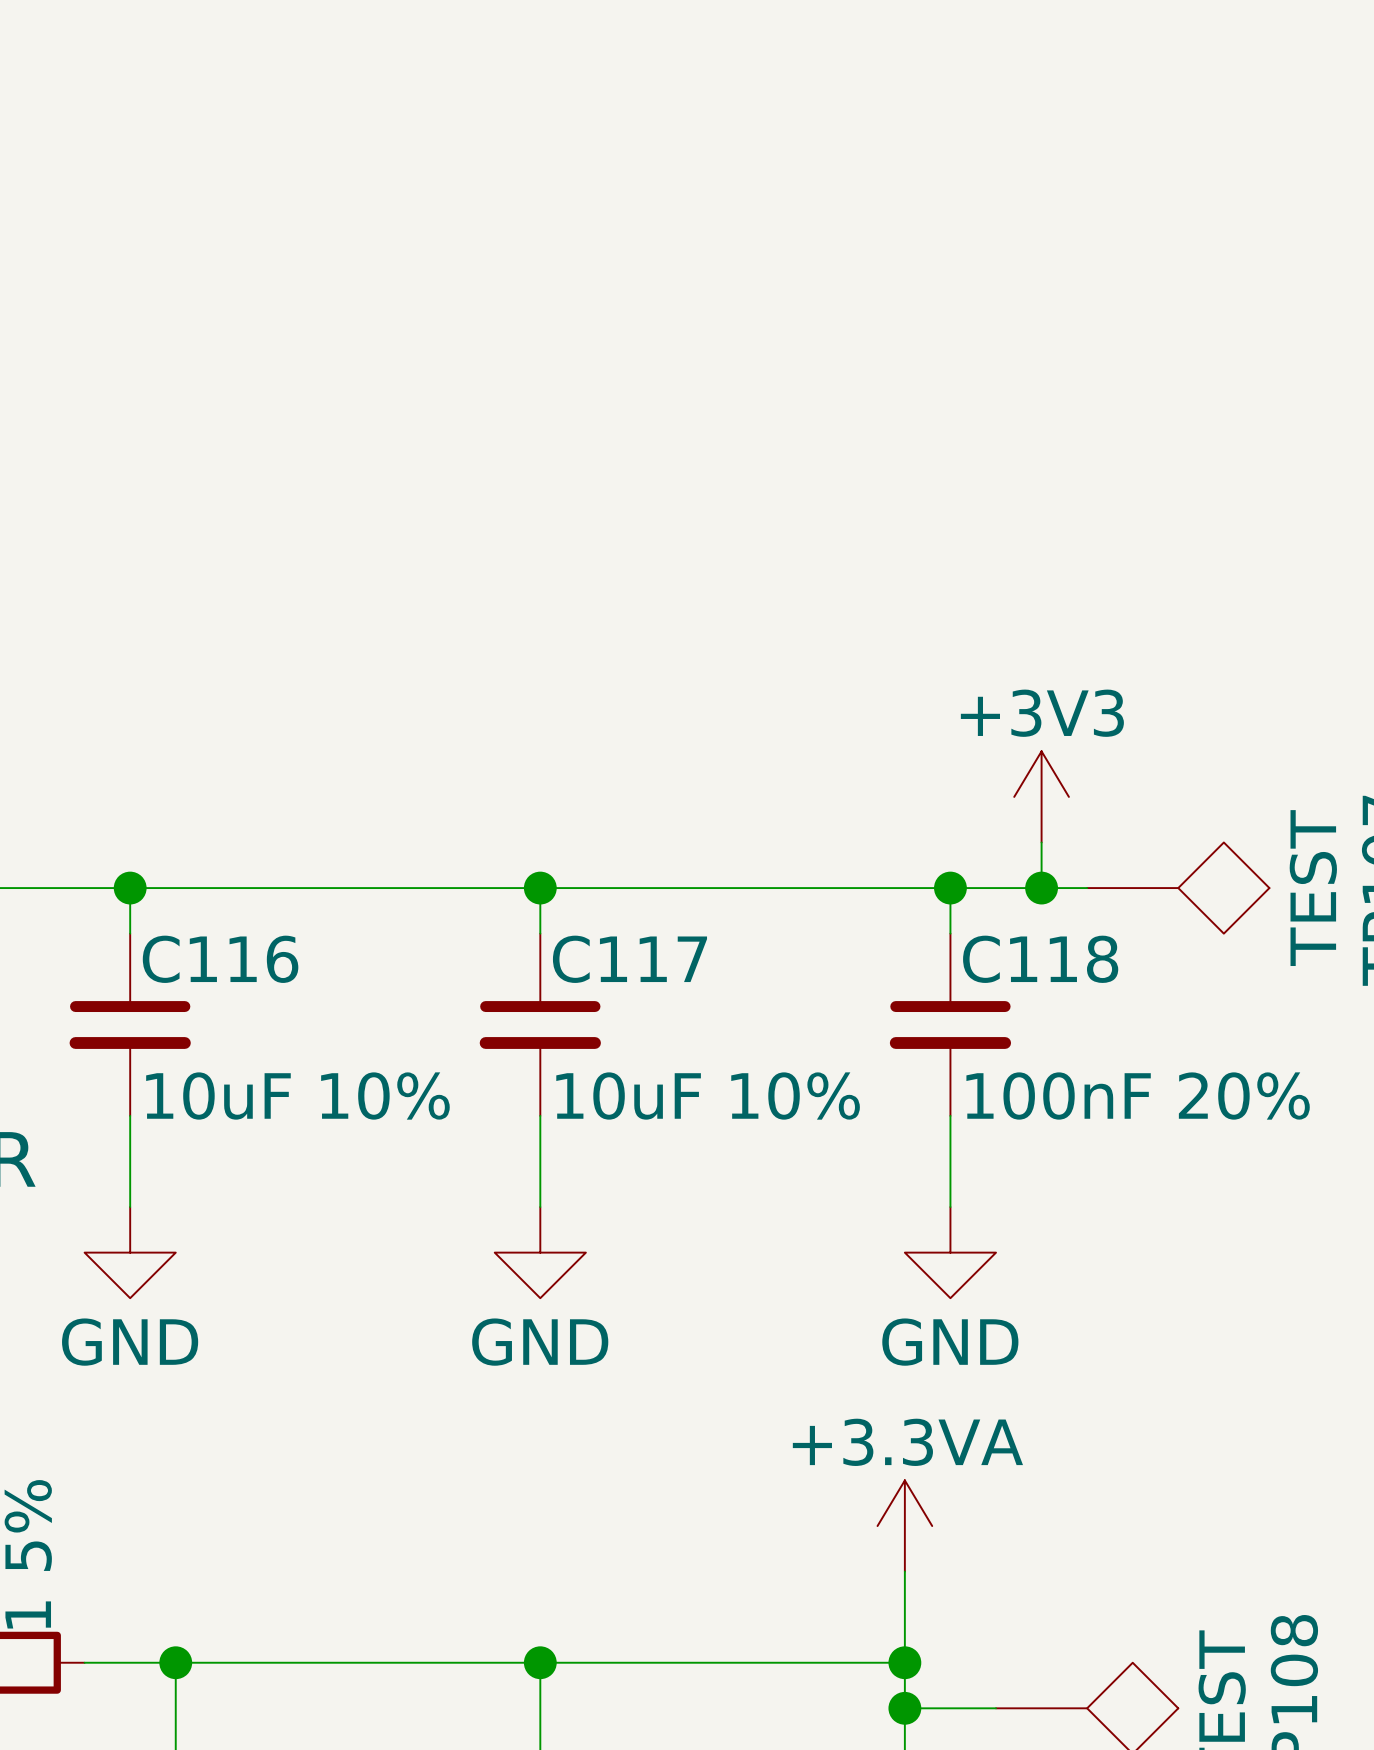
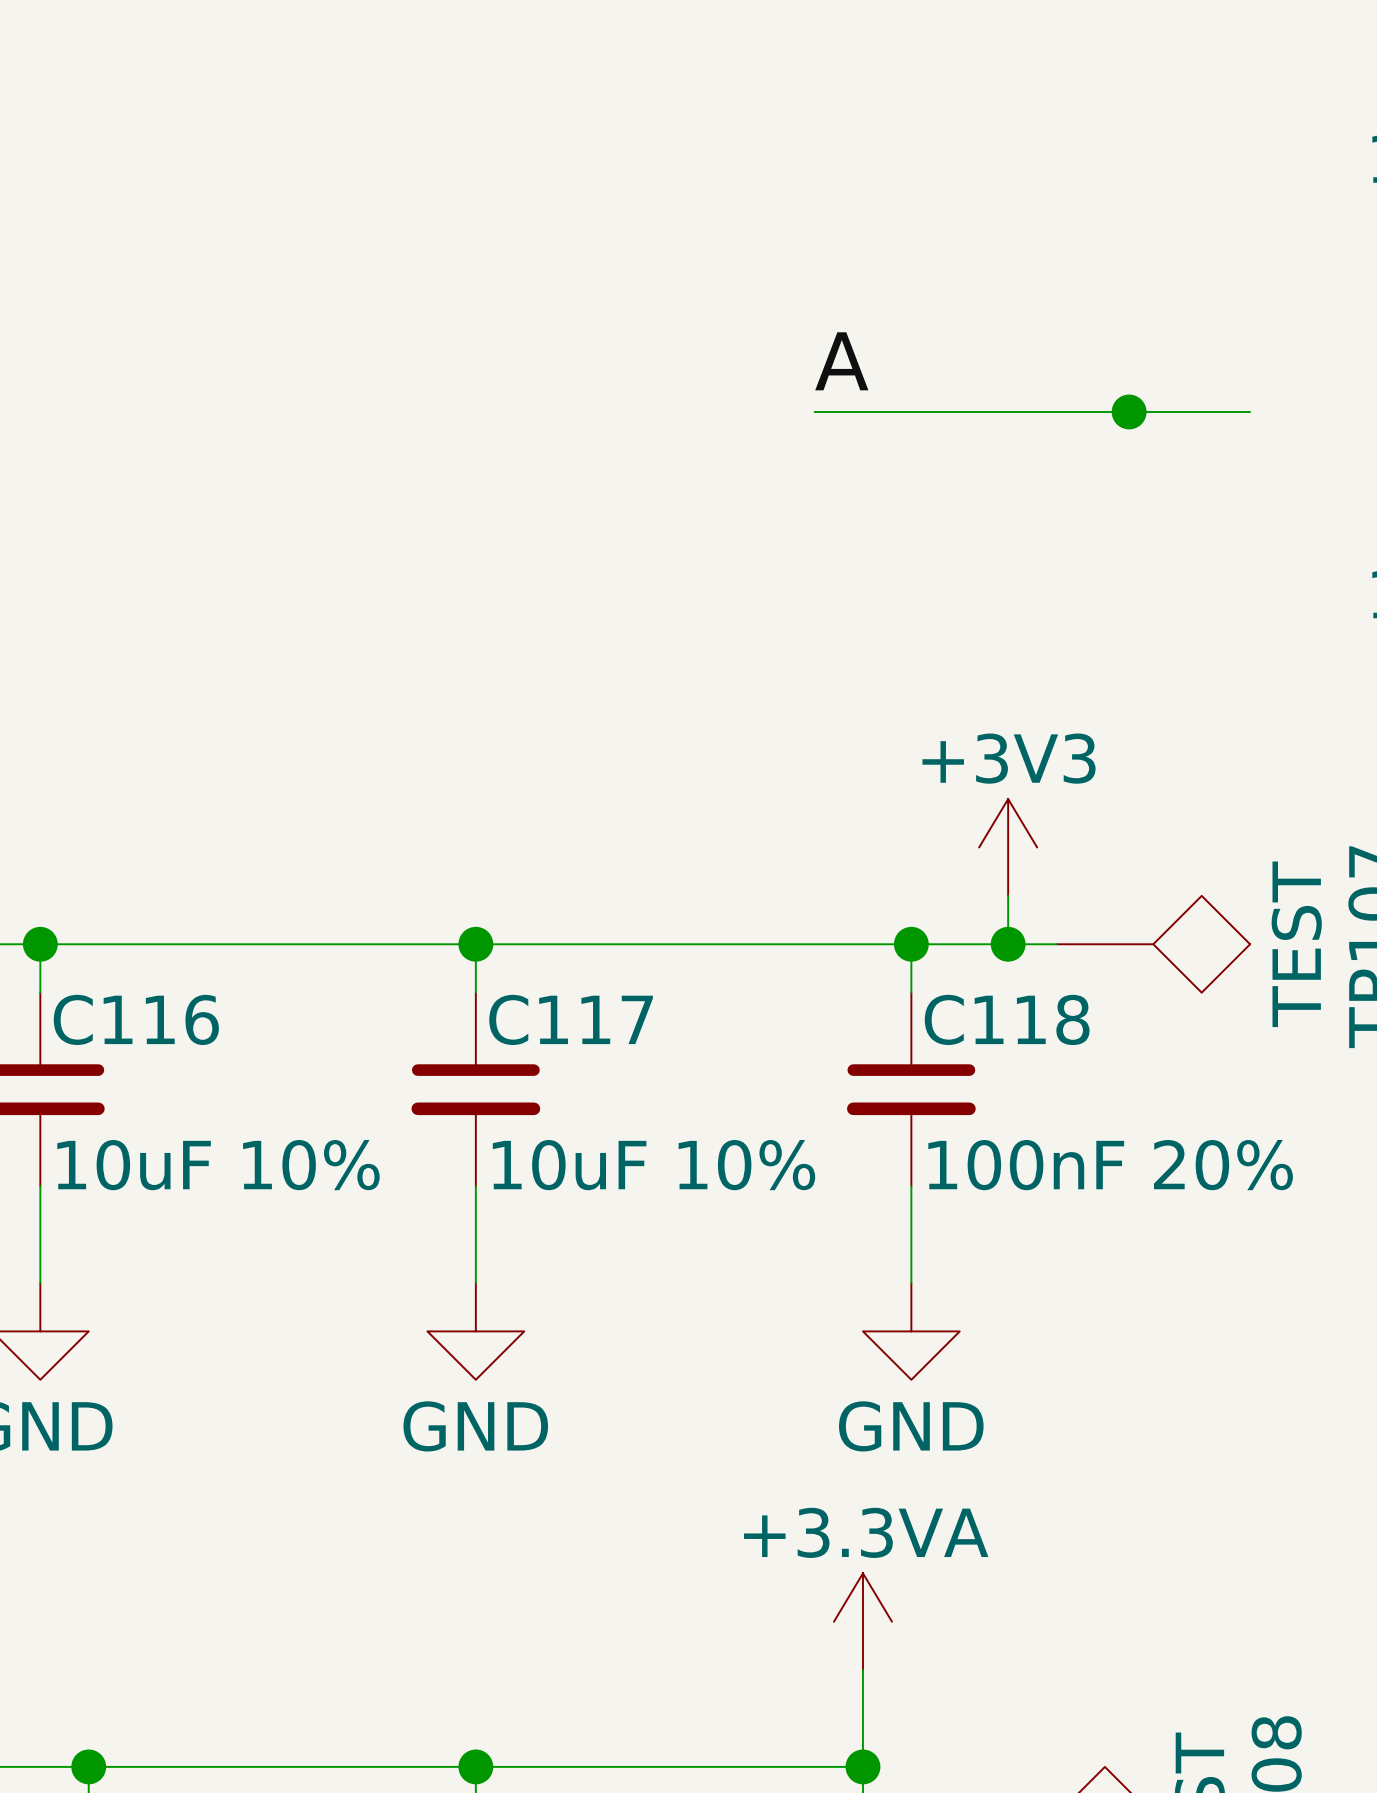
label: none -> A (841, 361)
wire: none -> (814, 411) (1250, 411)
junction: none -> (1129, 411)

